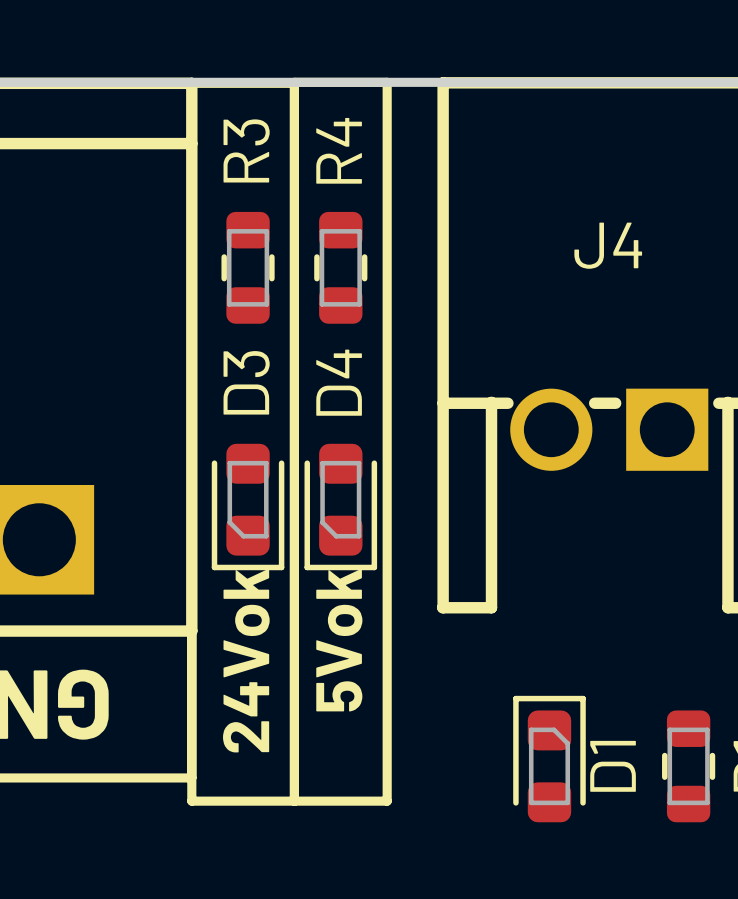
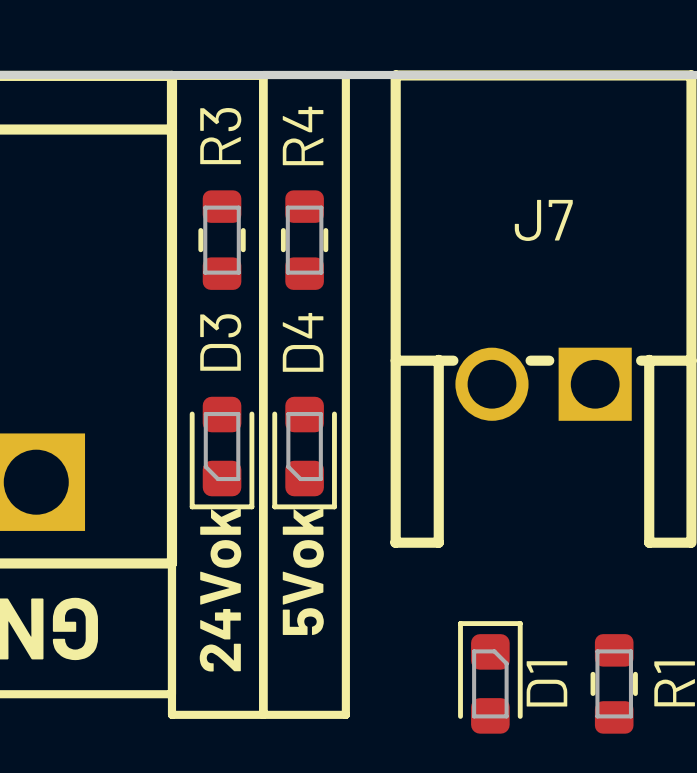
J4 name: J4 (608, 245) -> J7 (543, 220)

